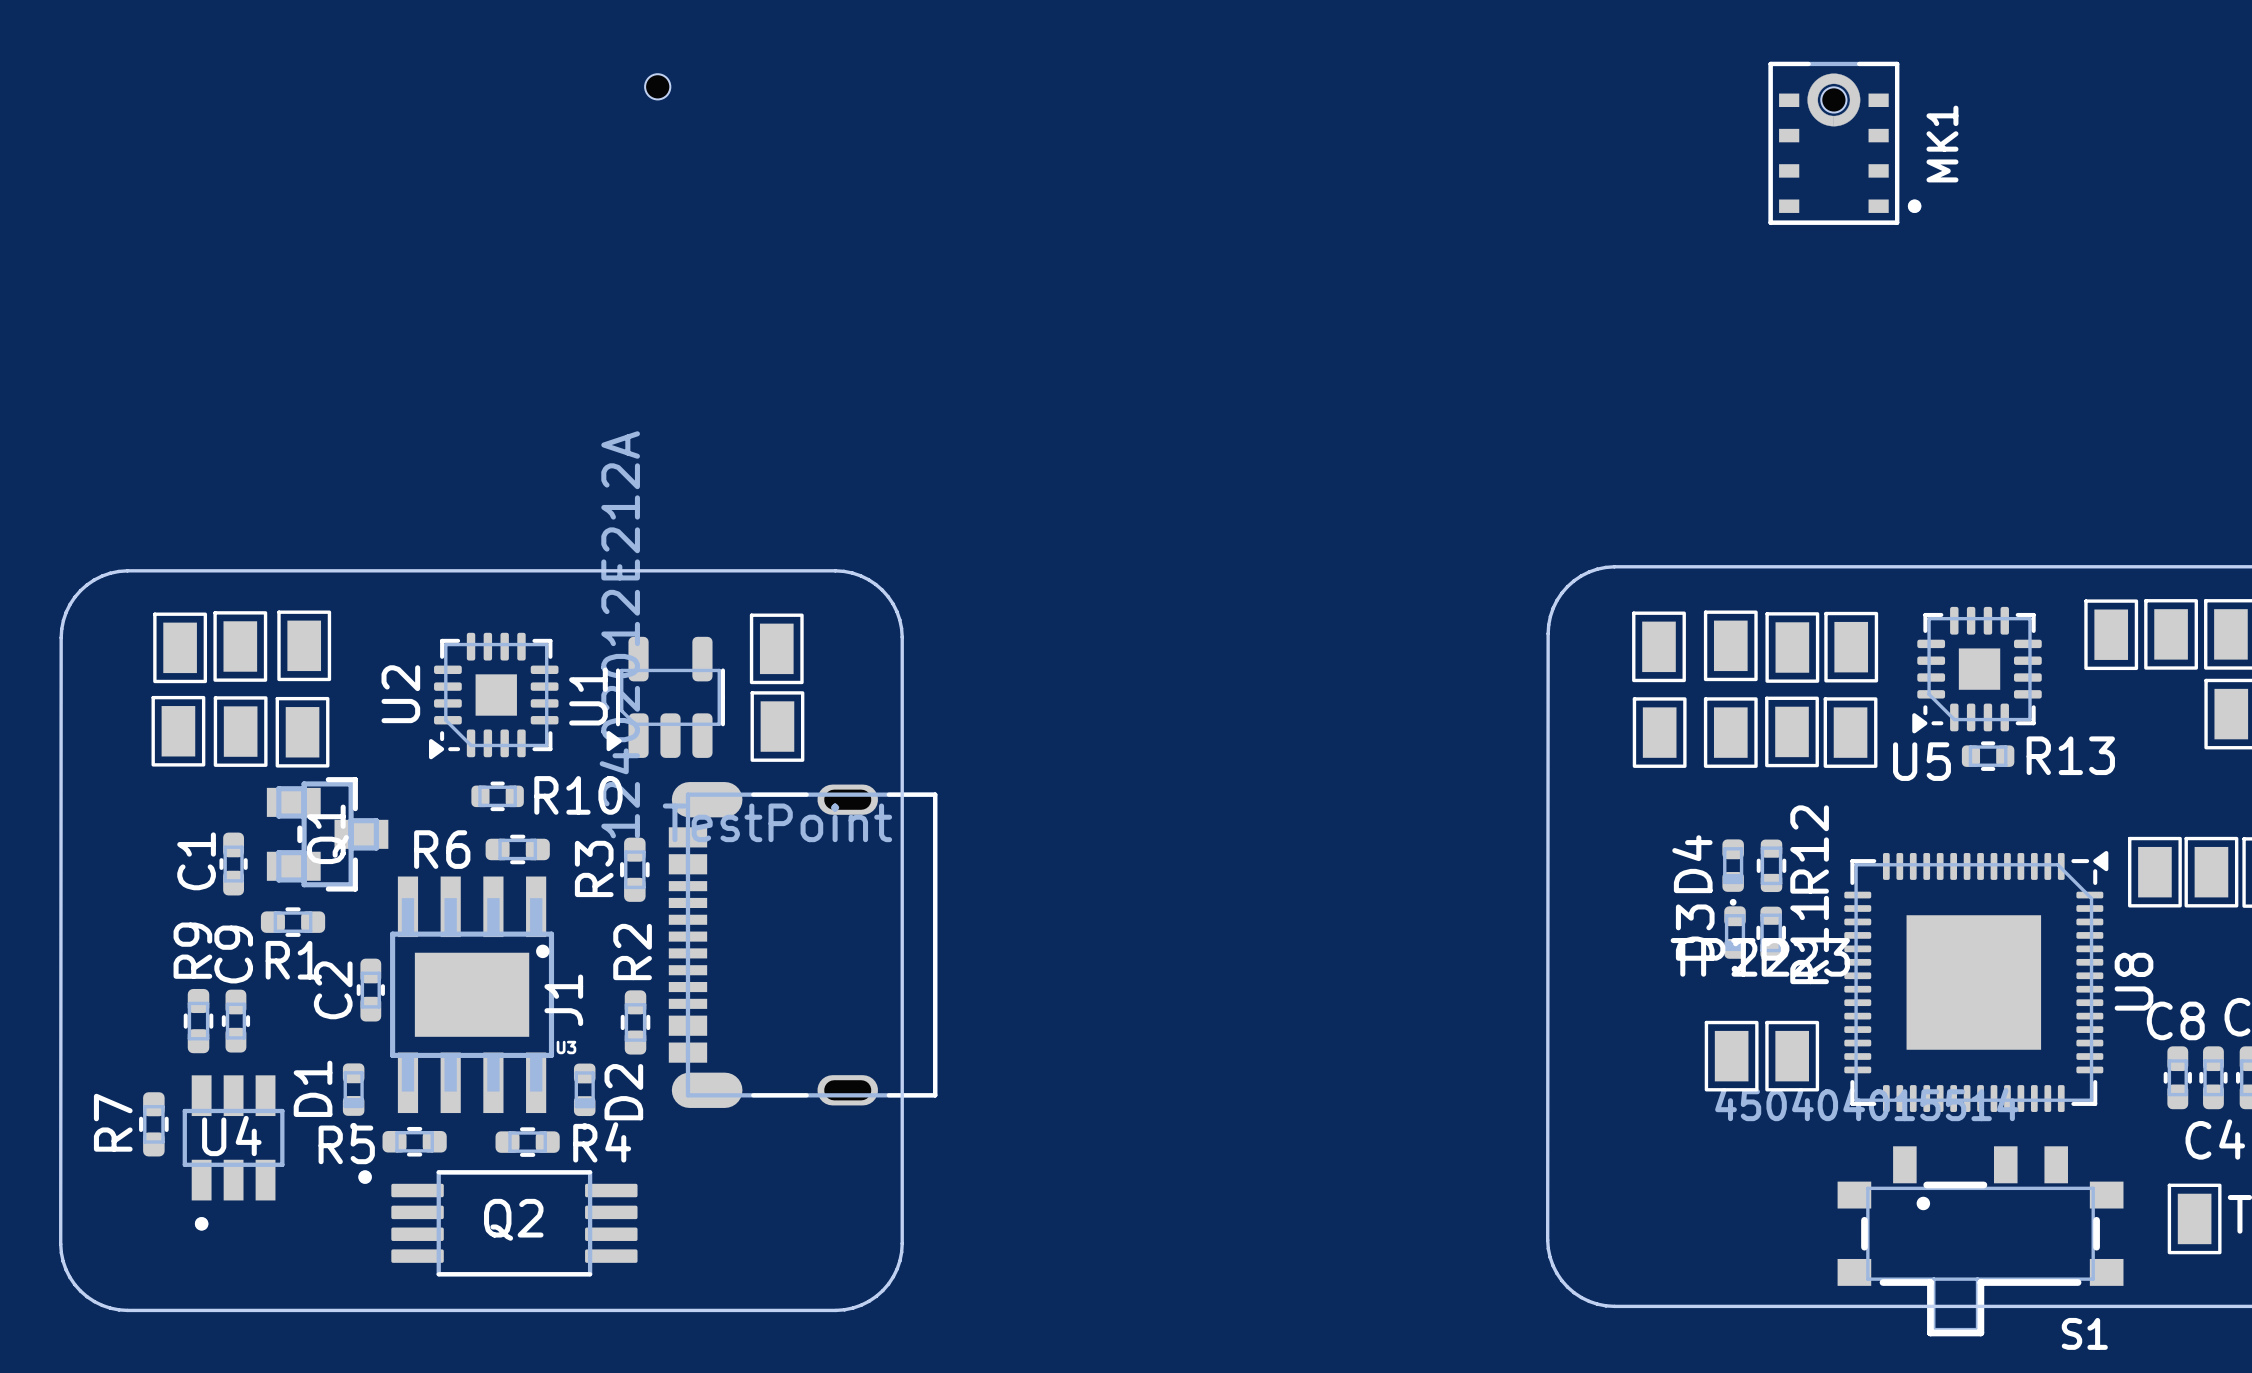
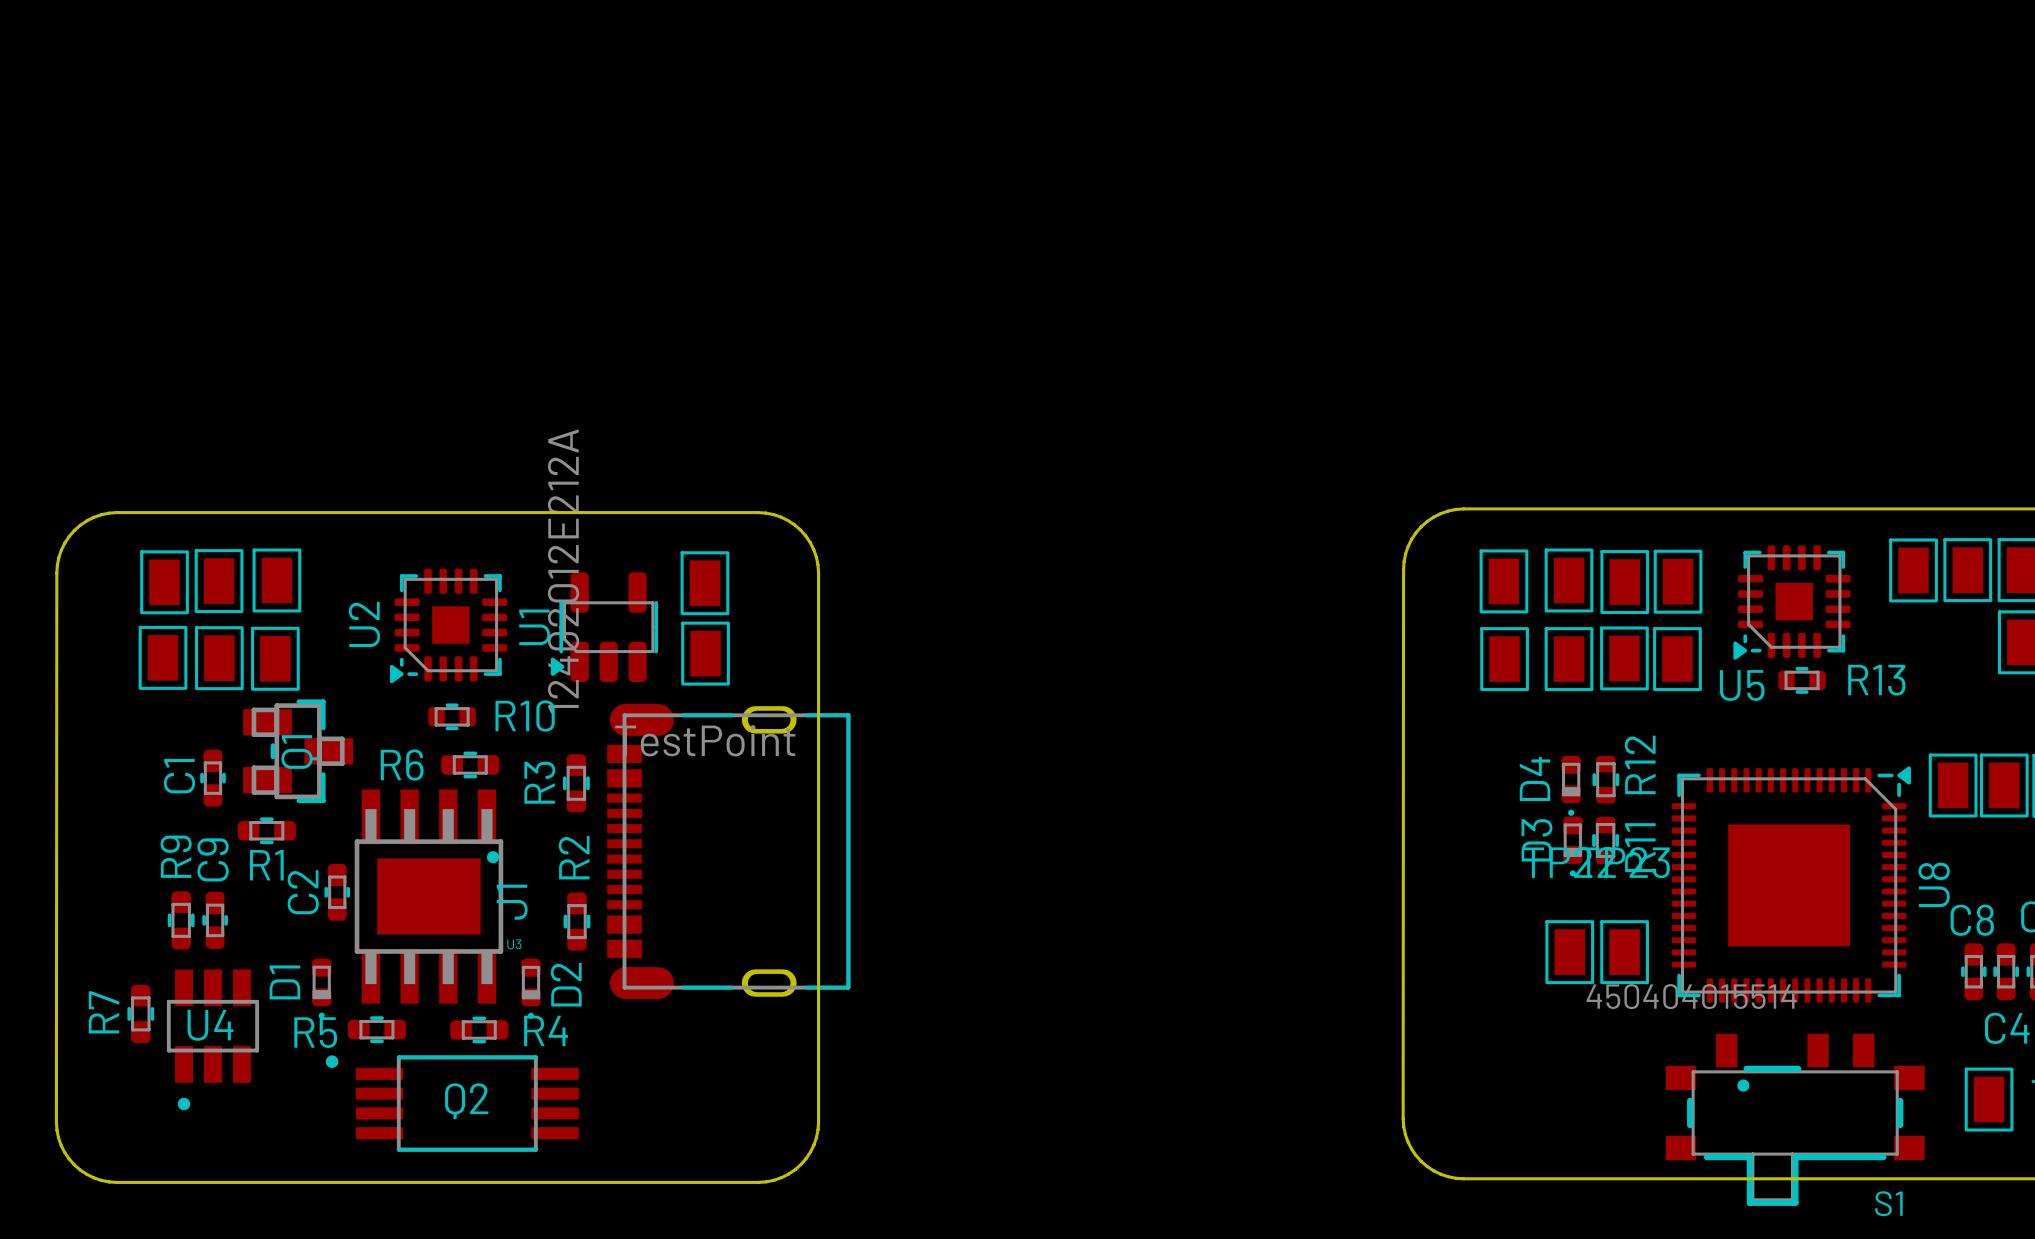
part: (657, 86) -> none
MK1: (1844, 143) -> none

